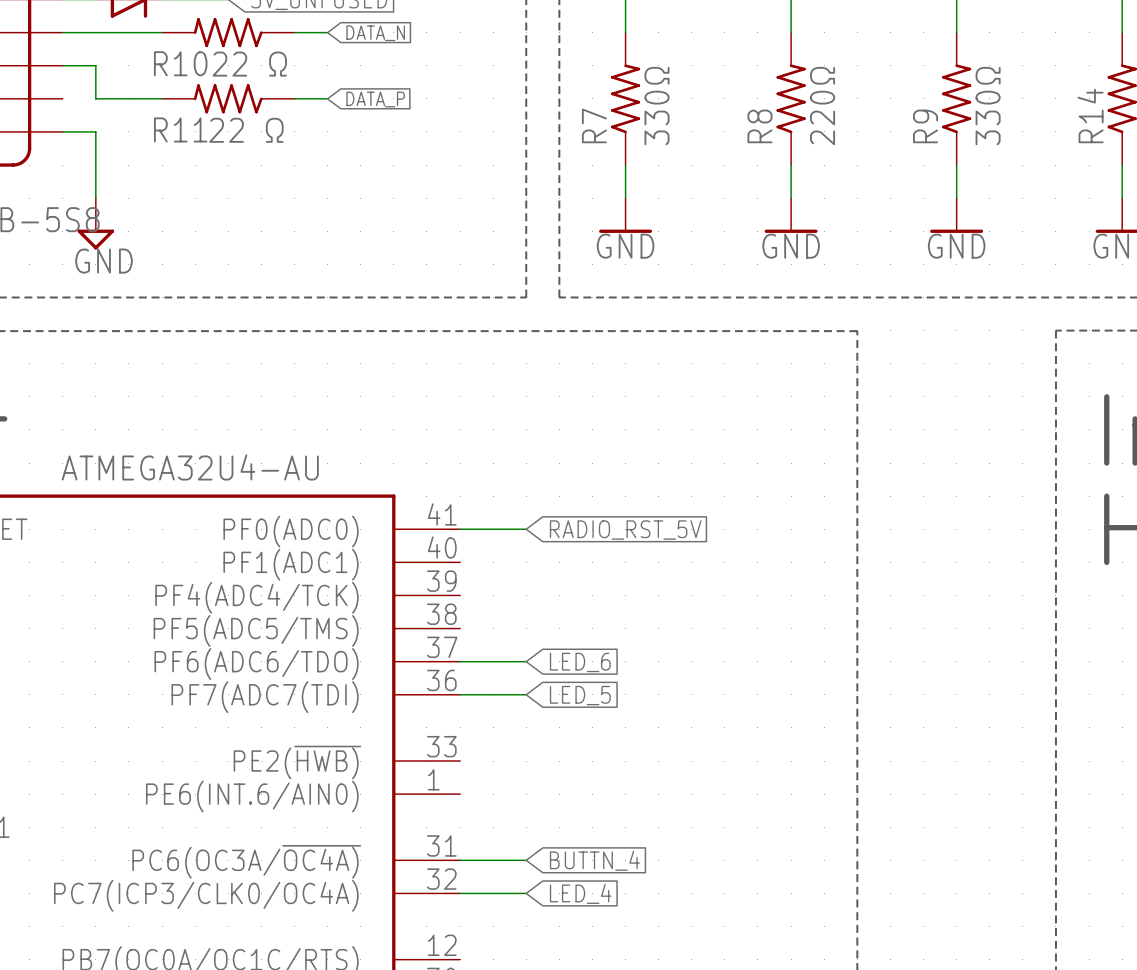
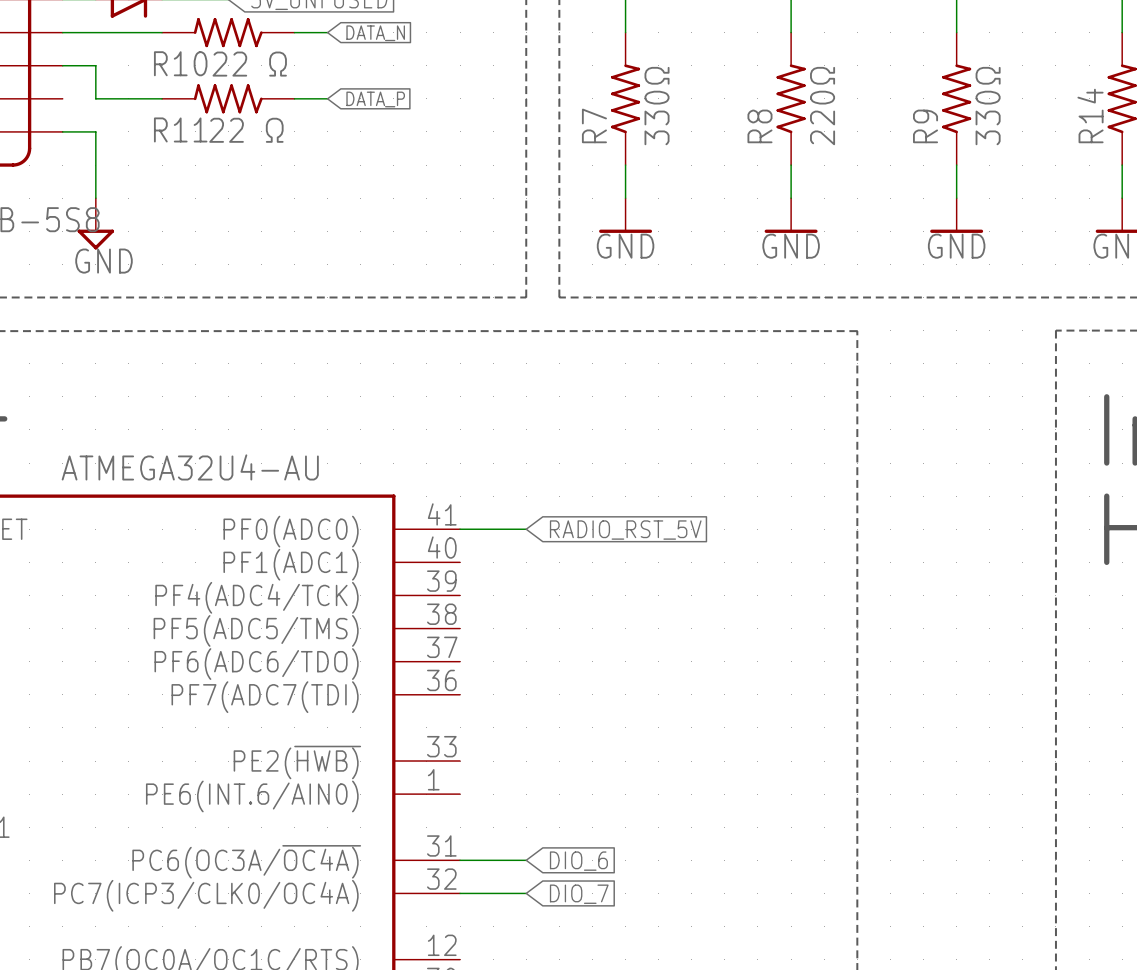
wire: (460, 661) (526, 661) -> none
global label: LED_6 (580, 662) -> none
wire: (460, 694) (526, 694) -> none
global label: LED_5 (580, 695) -> none
global label: BUTTN_4 (594, 860) -> DIO_6 (578, 861)
global label: LED_4 (580, 893) -> DIO_7 (579, 894)

